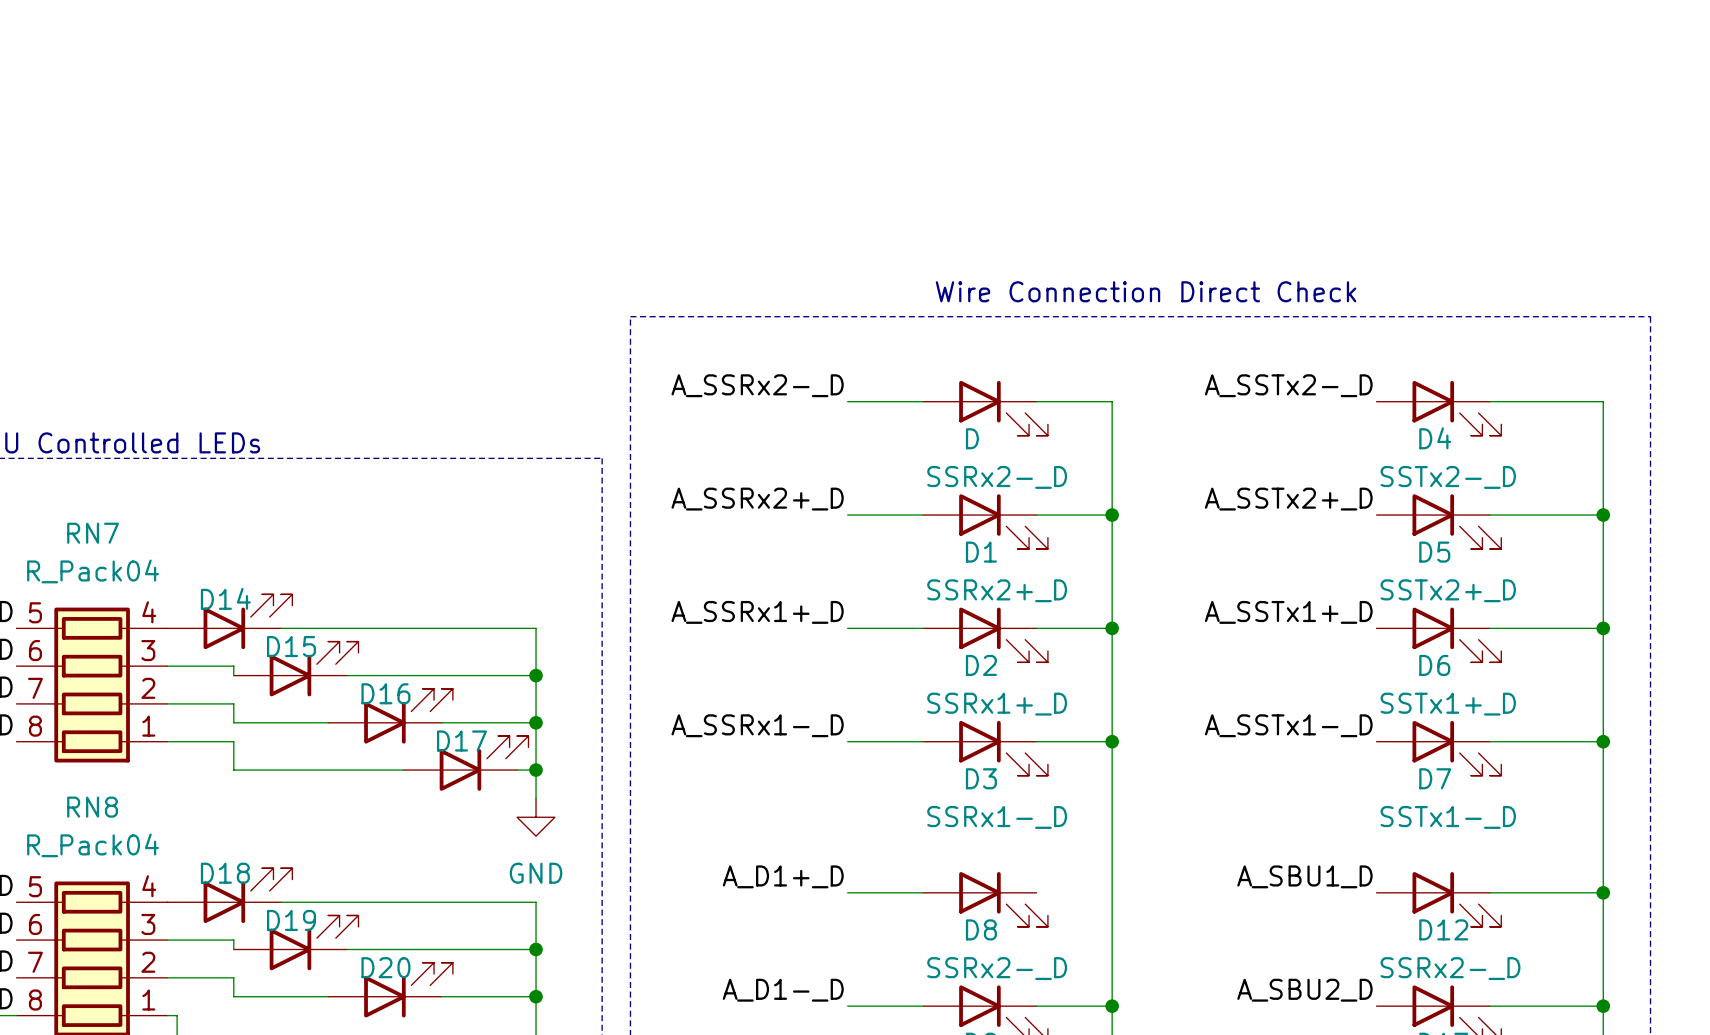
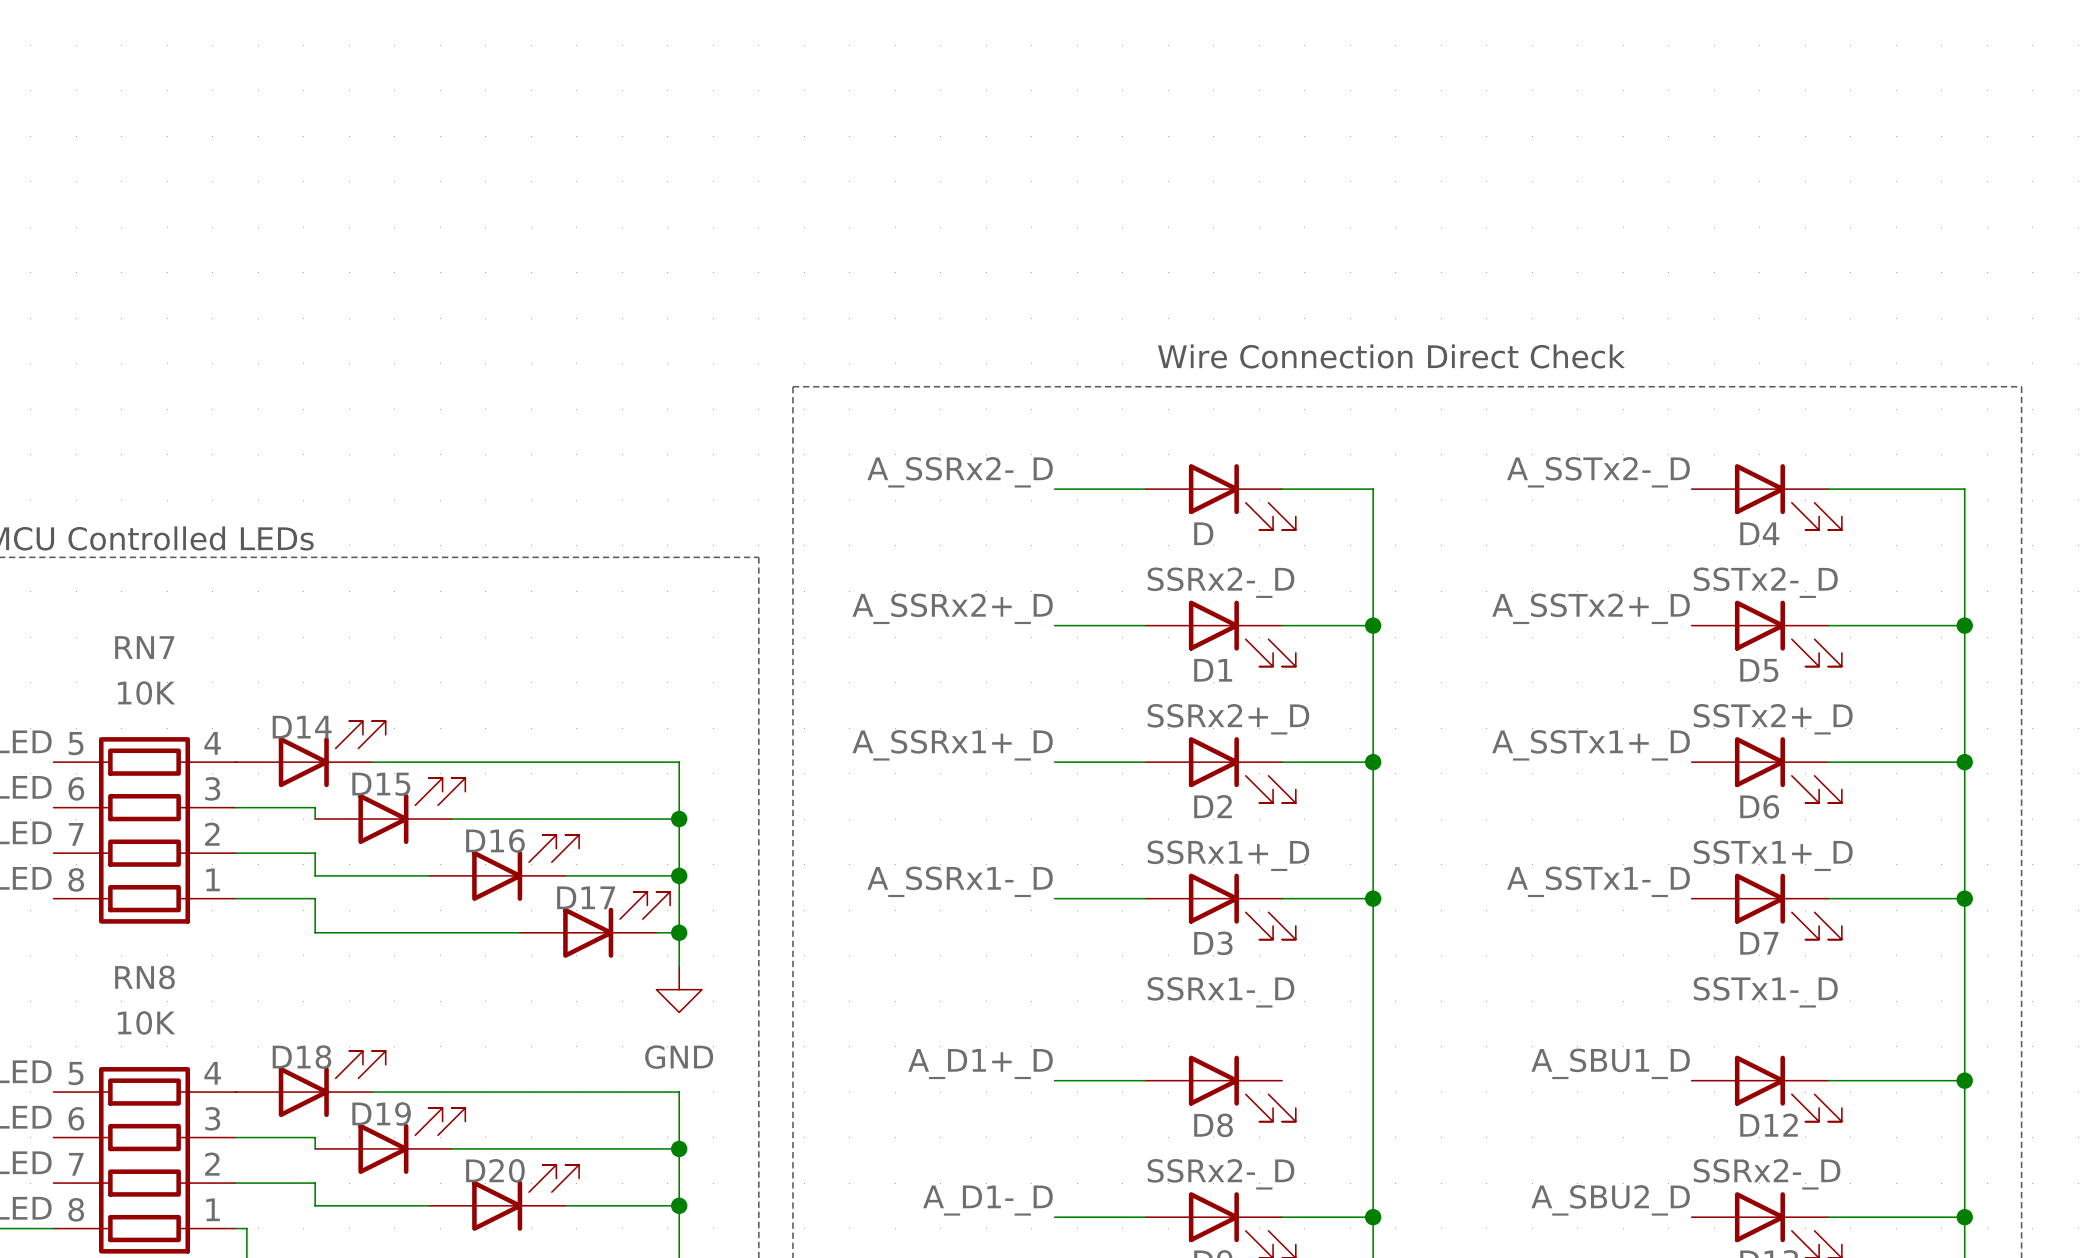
RN7 value: R_Pack04 (93, 571) -> 10K (146, 693)
RN8 value: R_Pack04 (93, 845) -> 10K (146, 1022)

